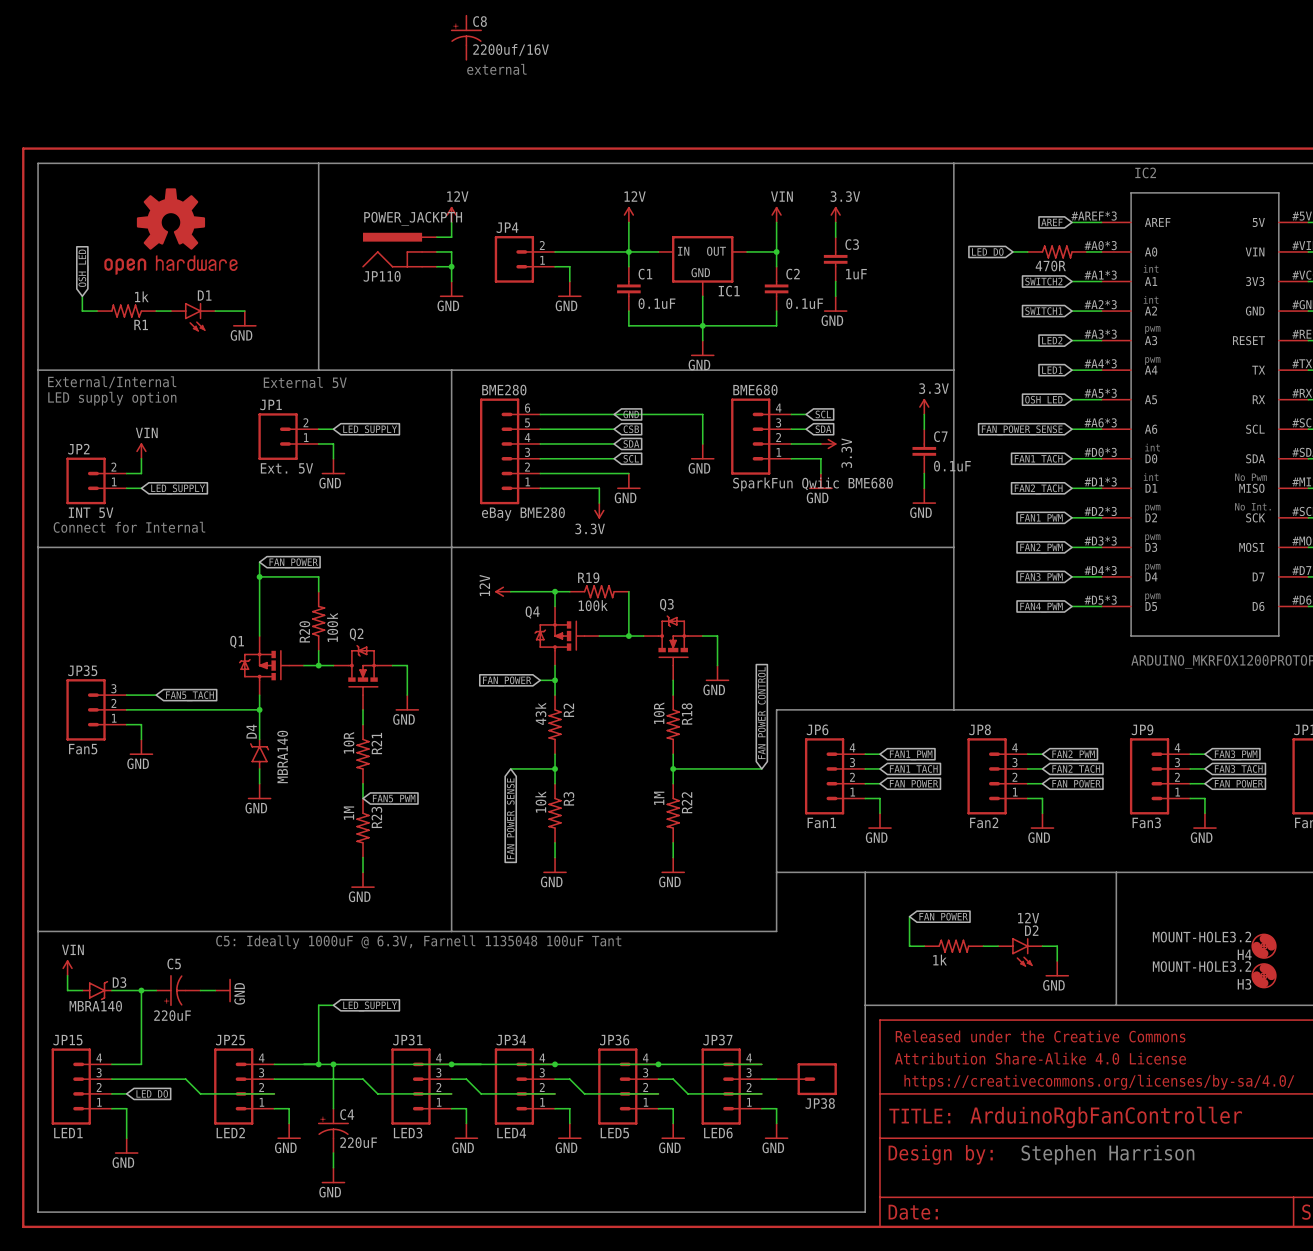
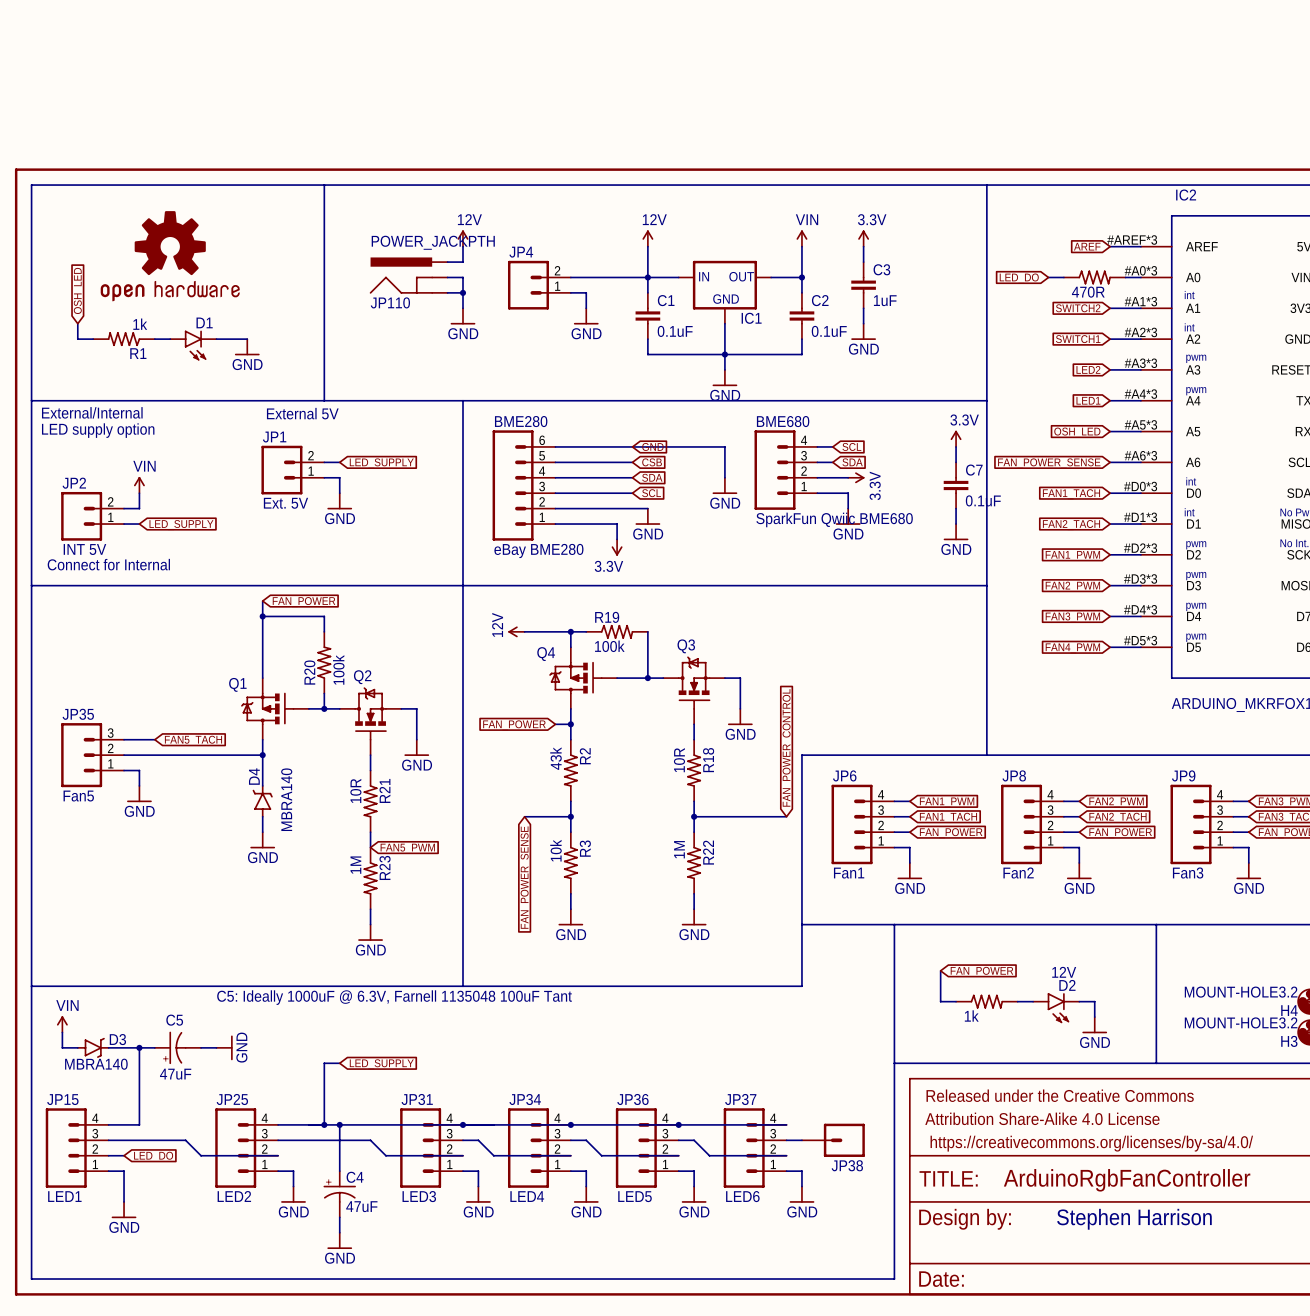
C8: 2200uf/16V (466, 37) -> none
text: external (496, 69) -> none
C5 value: 220uF (172, 1015) -> 47uF (175, 1074)
C4 value: 220uF (358, 1142) -> 47uF (361, 1206)

